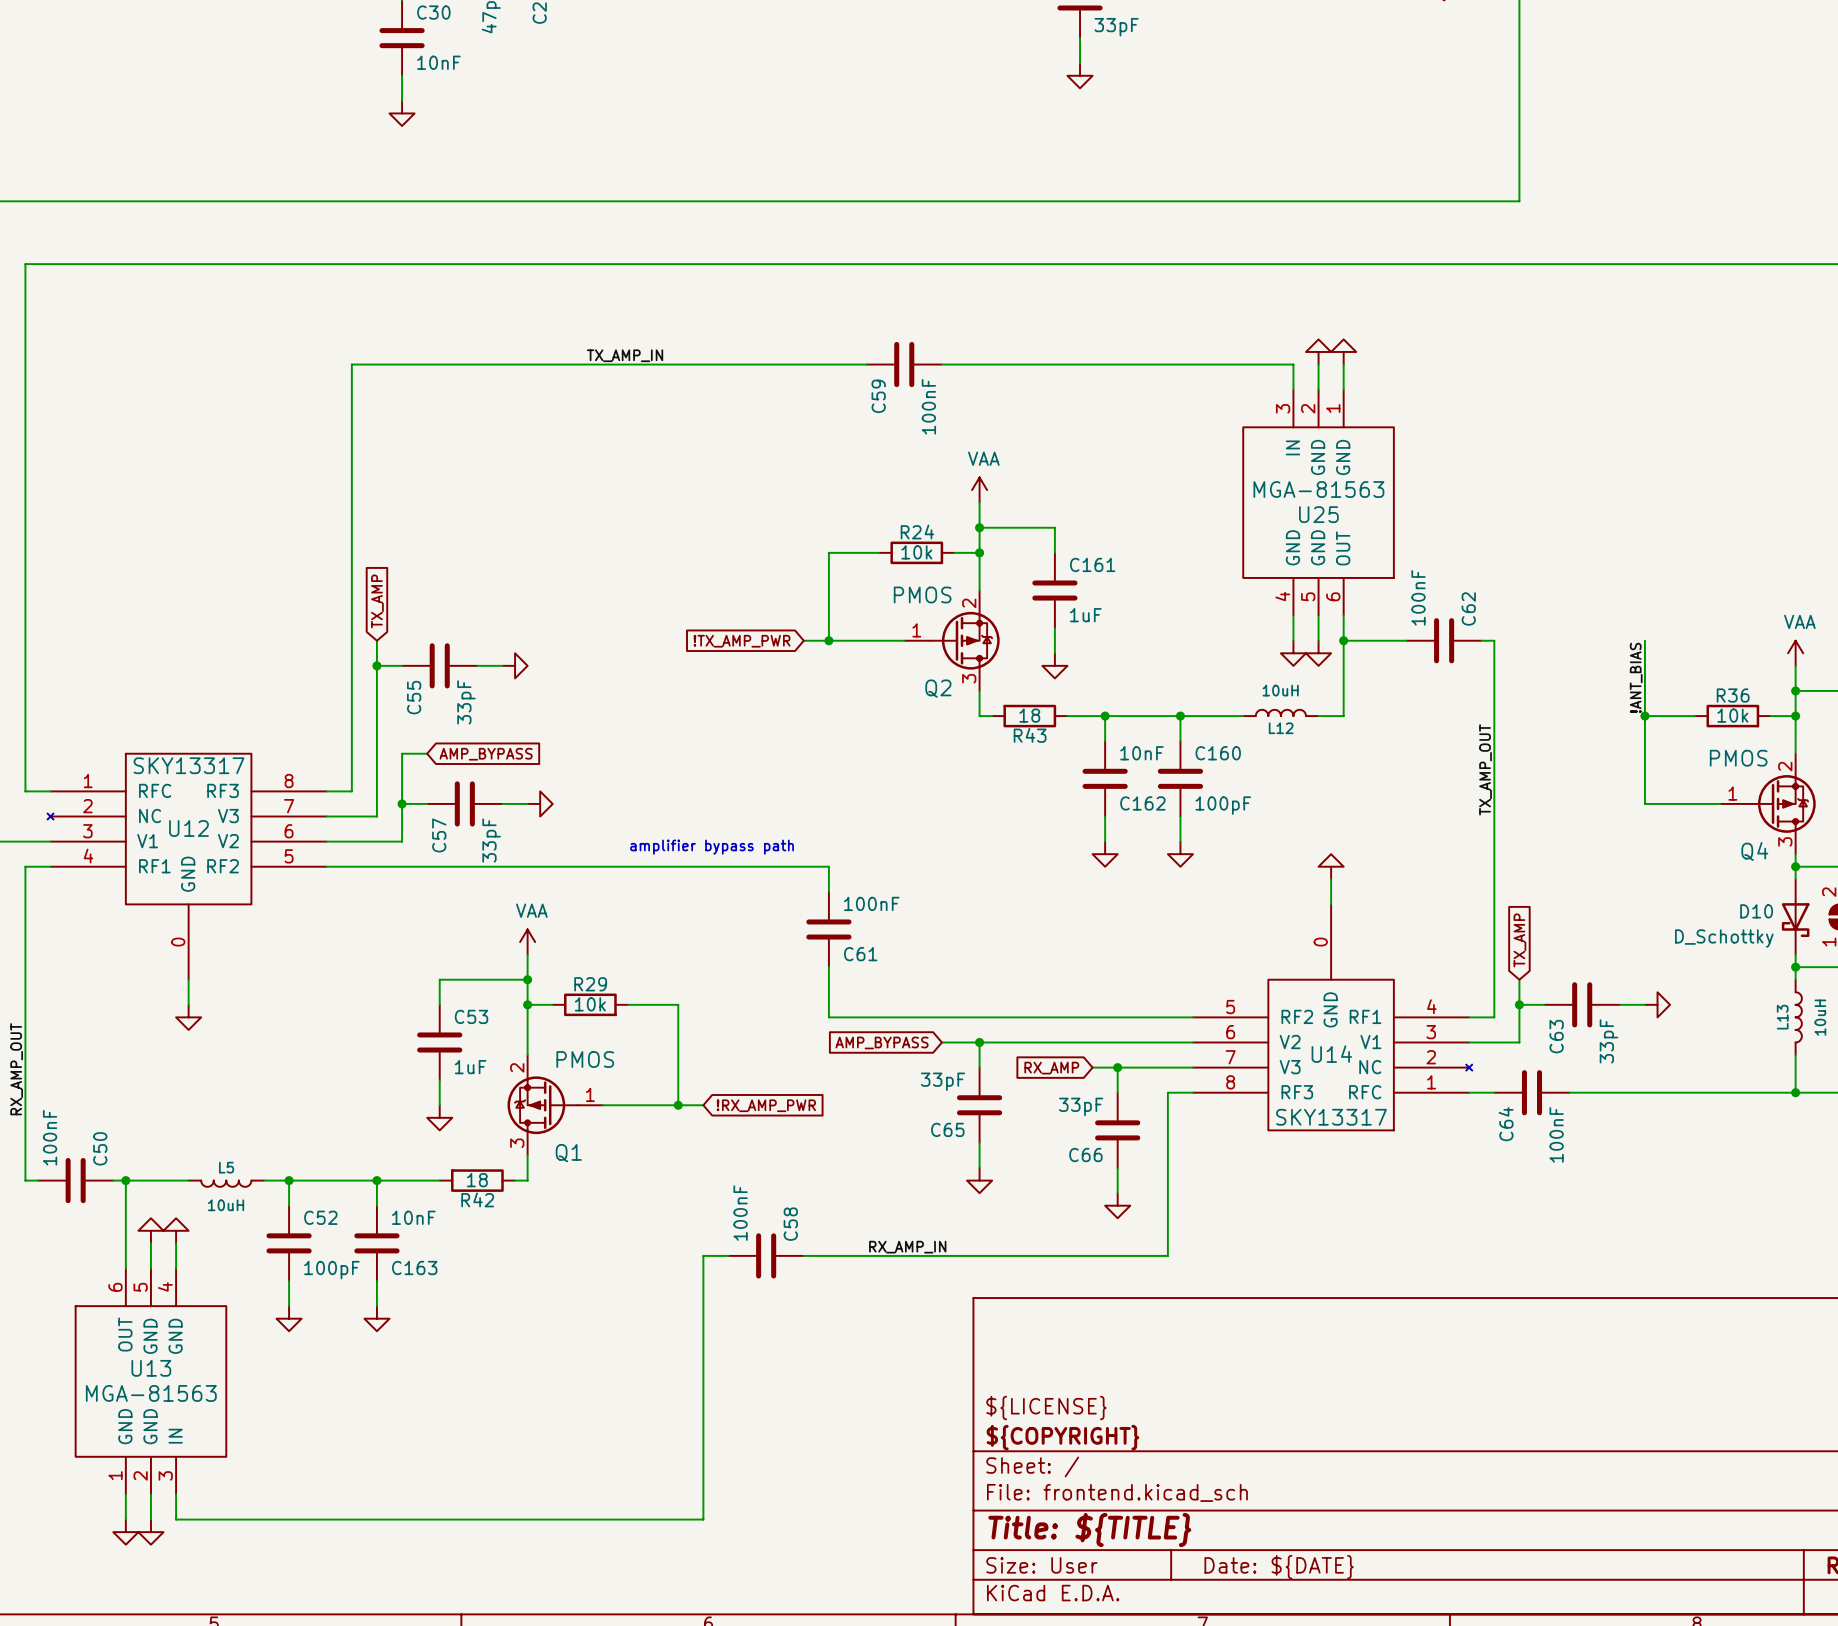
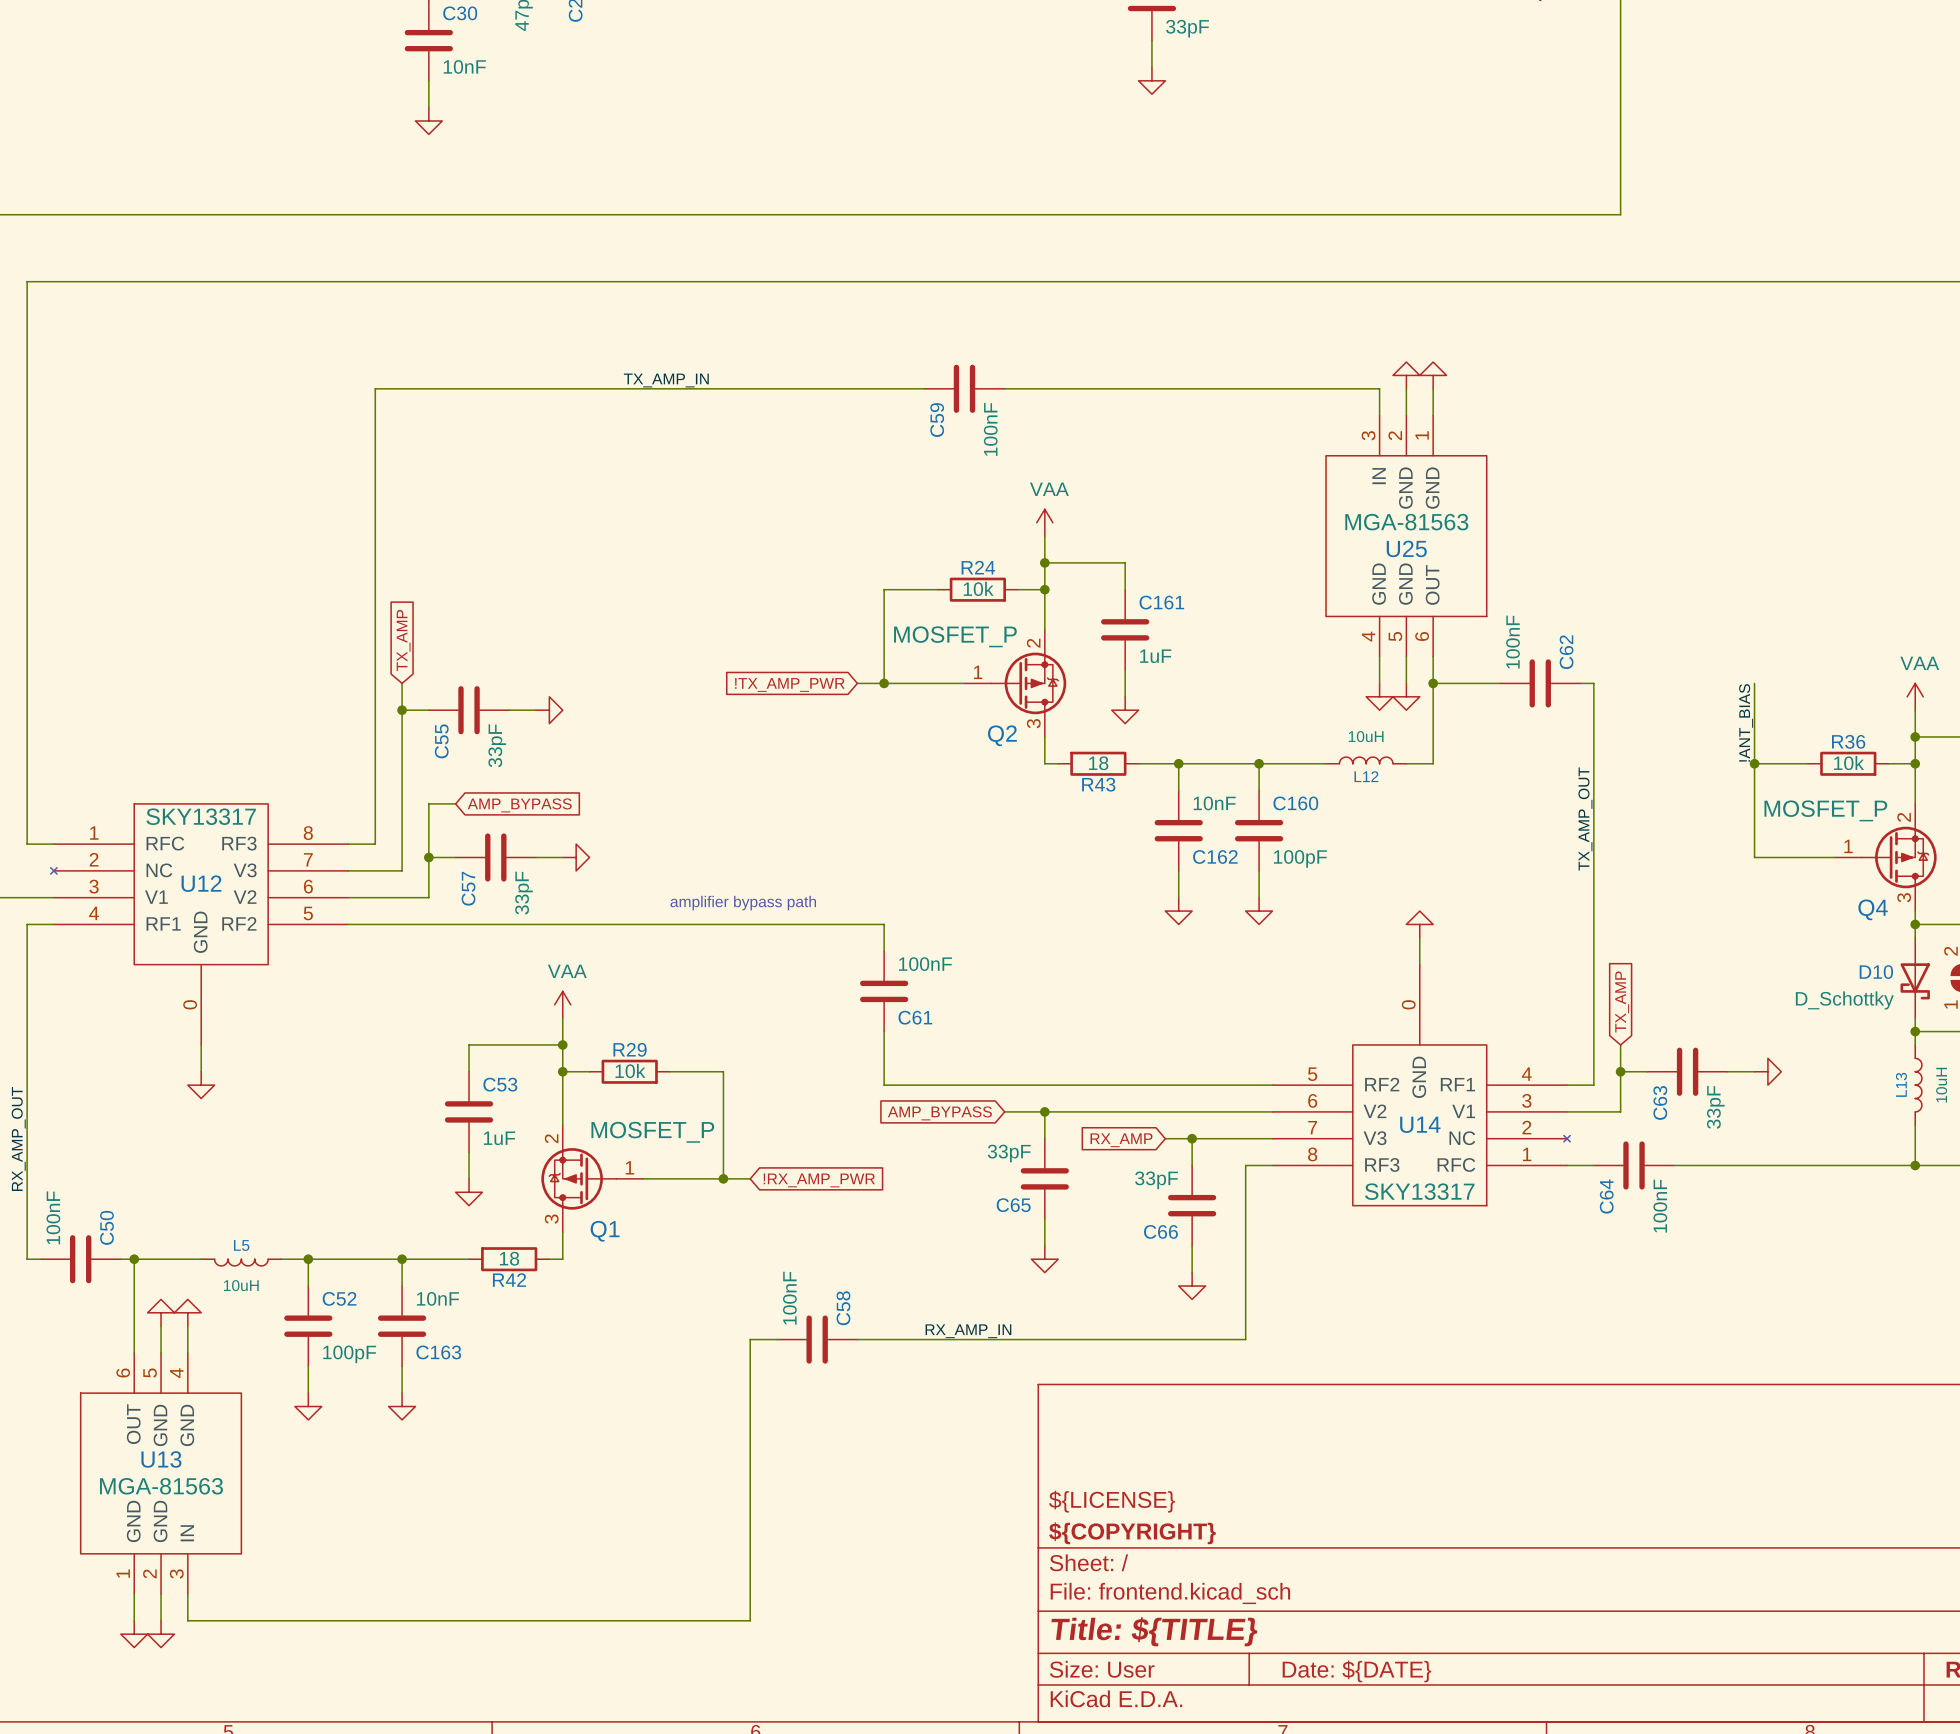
Q2 value: PMOS (922, 594) -> MOSFET_P (955, 636)
Q4 value: PMOS (1738, 758) -> MOSFET_P (1825, 810)
Q1 value: PMOS (585, 1059) -> MOSFET_P (652, 1132)

